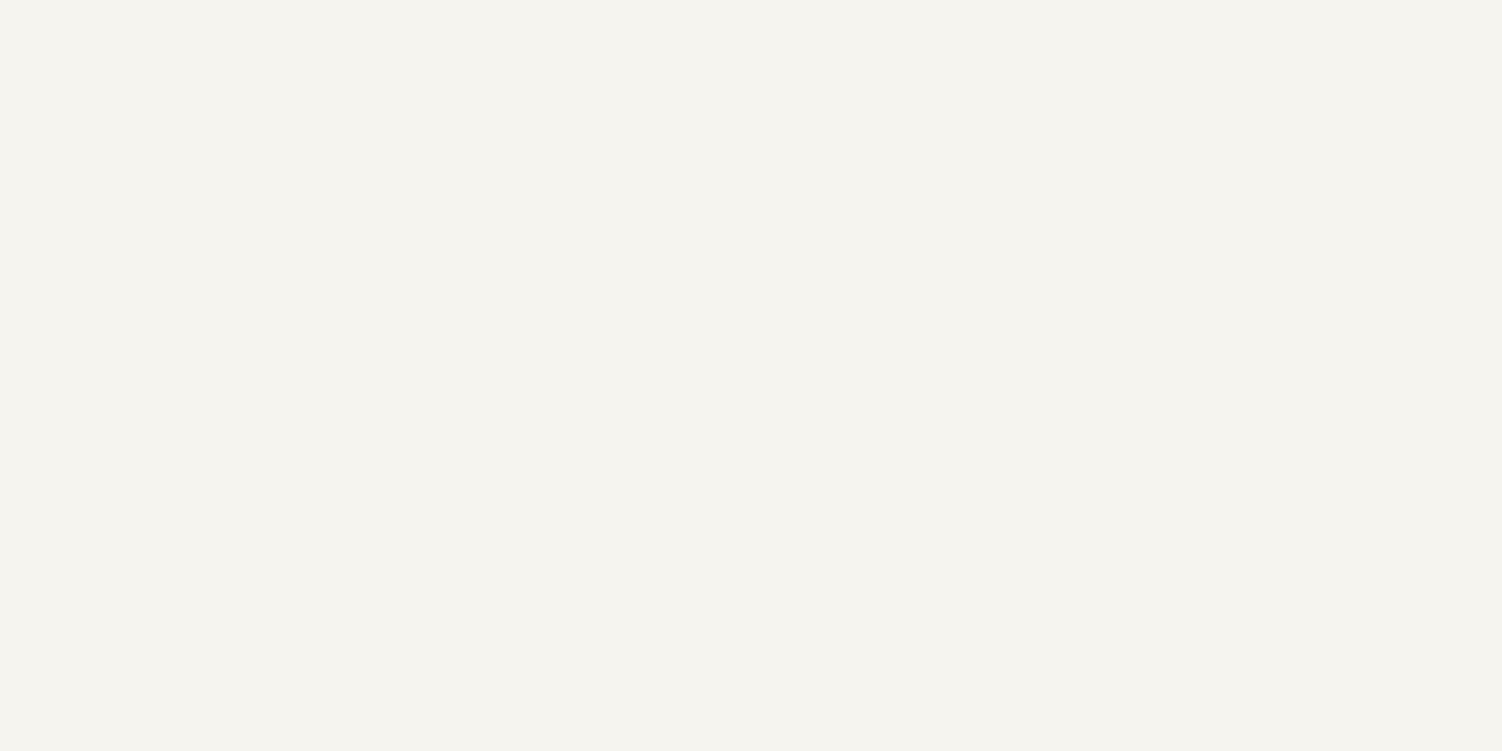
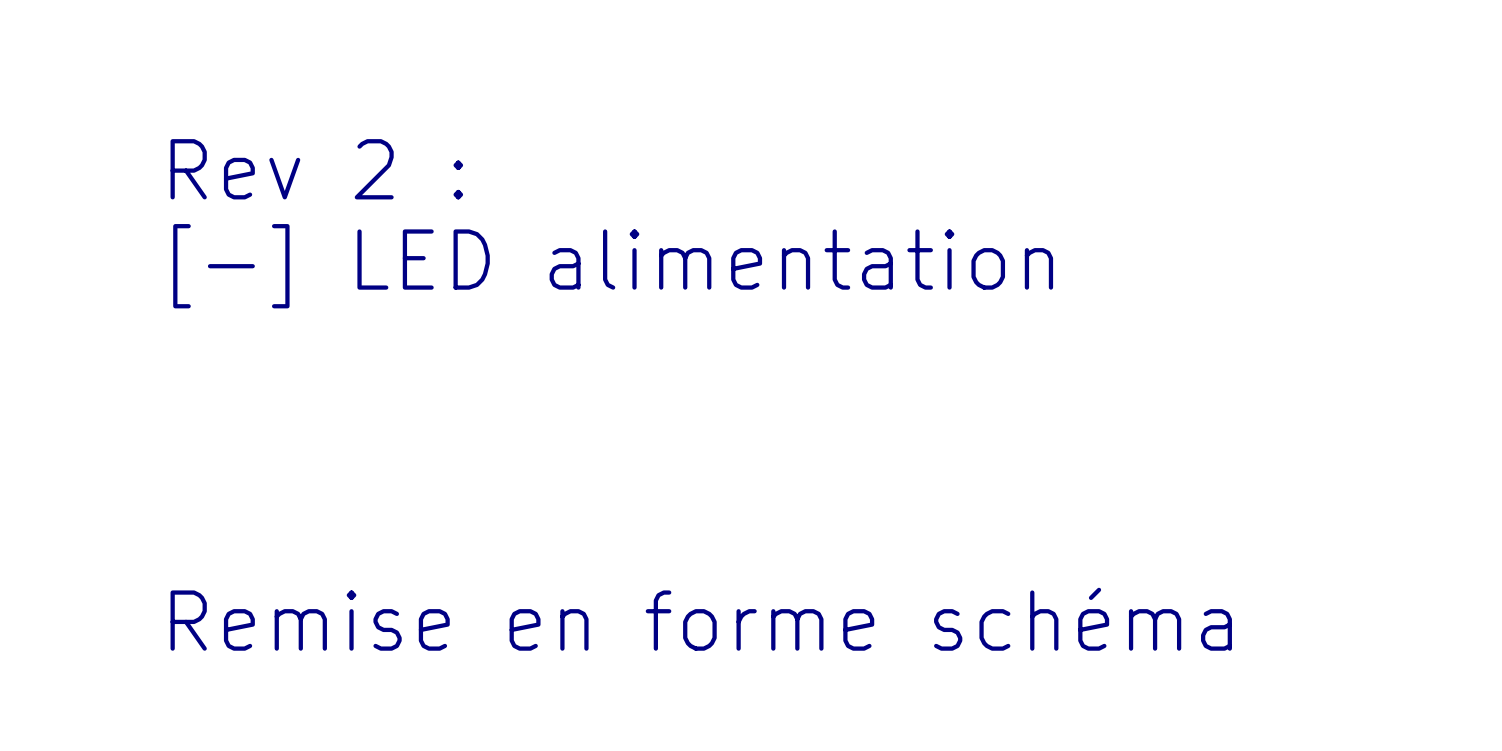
text: none -> Rev 2 : (316, 169)
text: none -> [-] LED alimentation (613, 266)
text: none -> Remise en forme schéma (701, 619)

